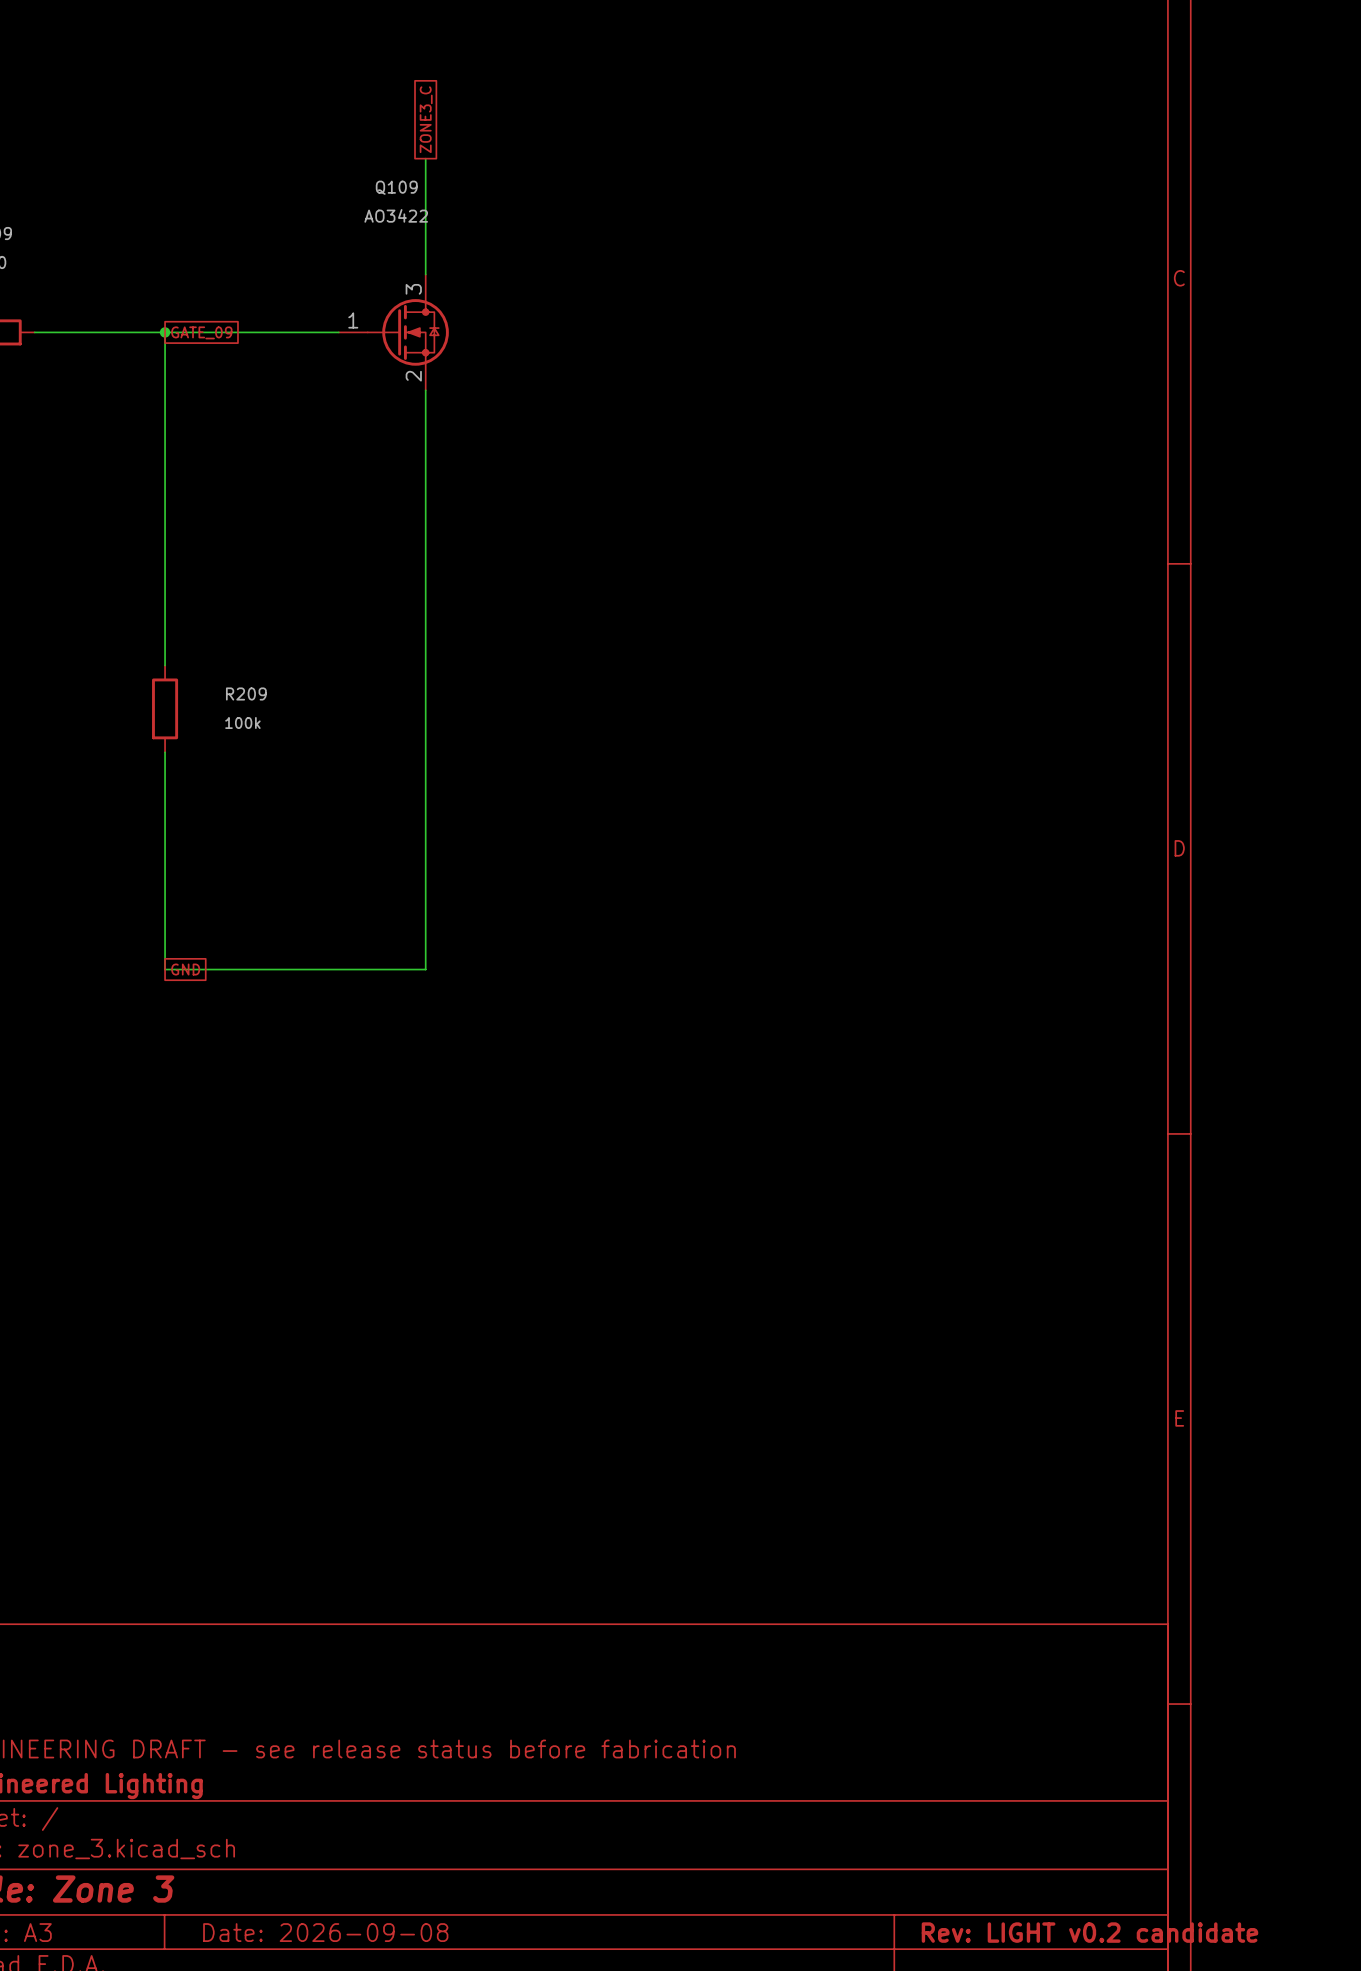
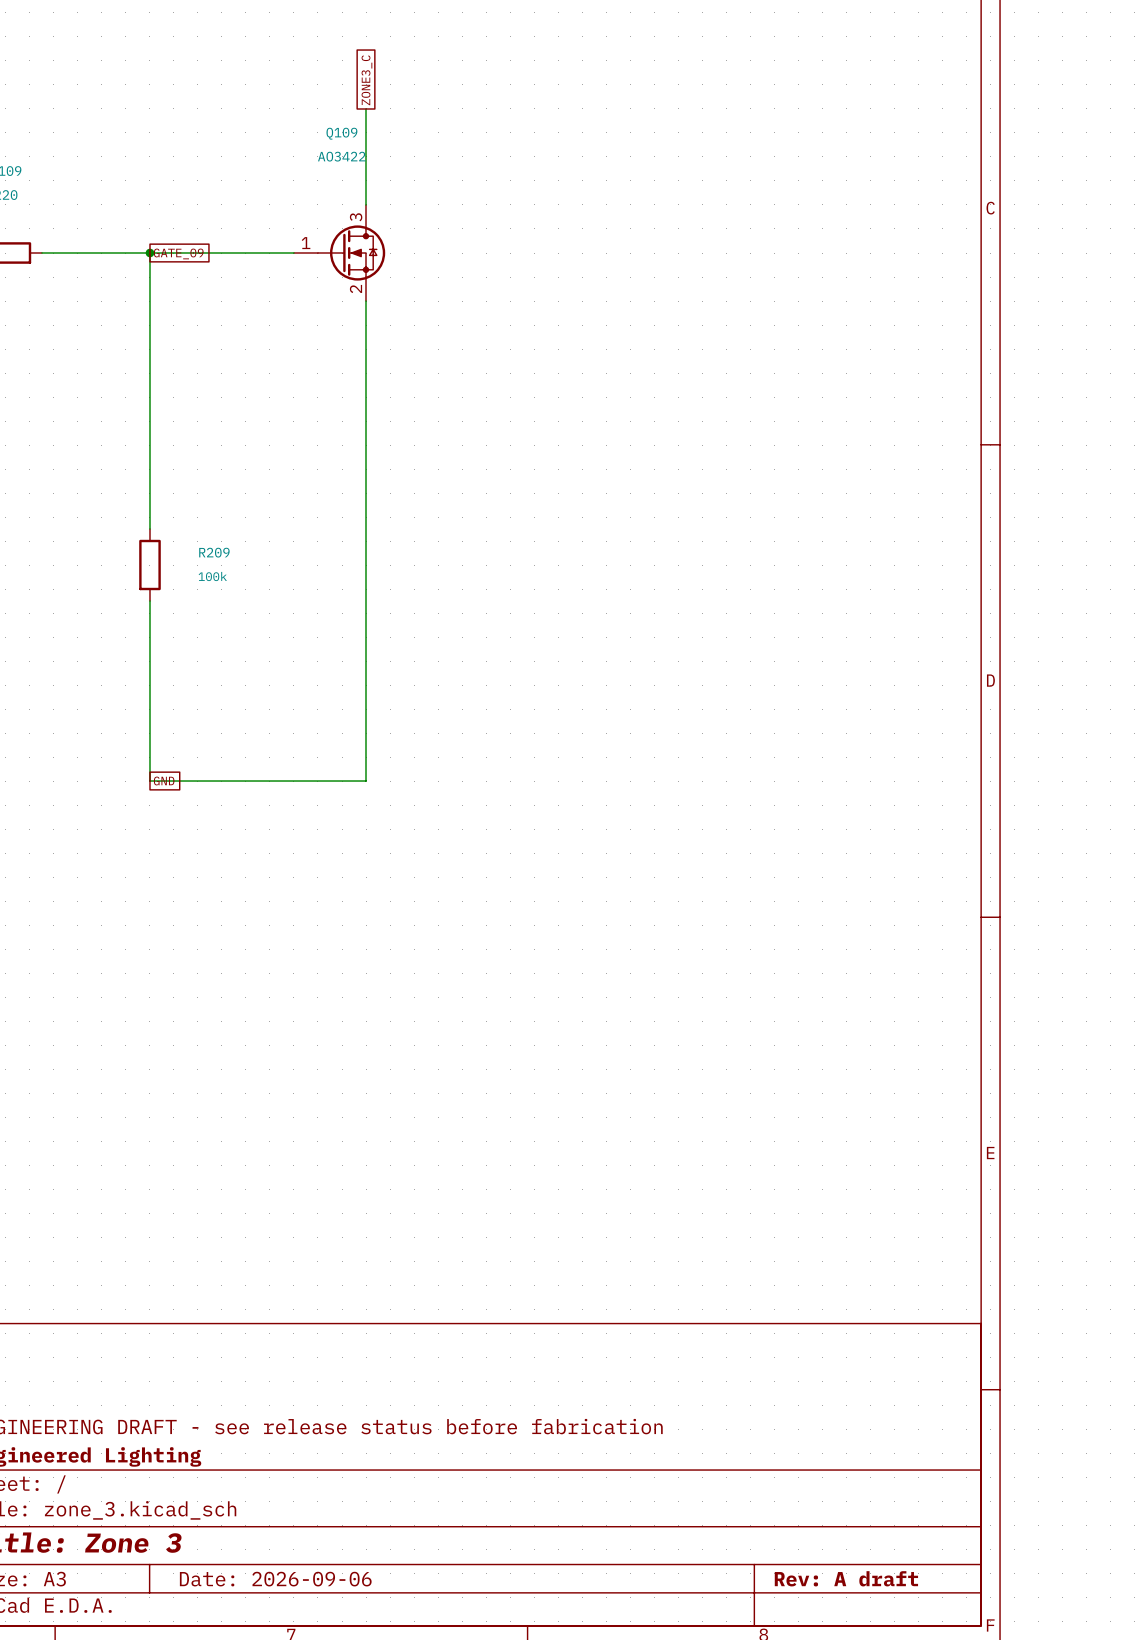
title block: Date: 2026-09-08 (325, 1932) -> Date: 2026-09-06 (275, 1579)
title block: Rev: LIGHT v0.2 candidate (1089, 1932) -> Rev: A draft (846, 1578)

